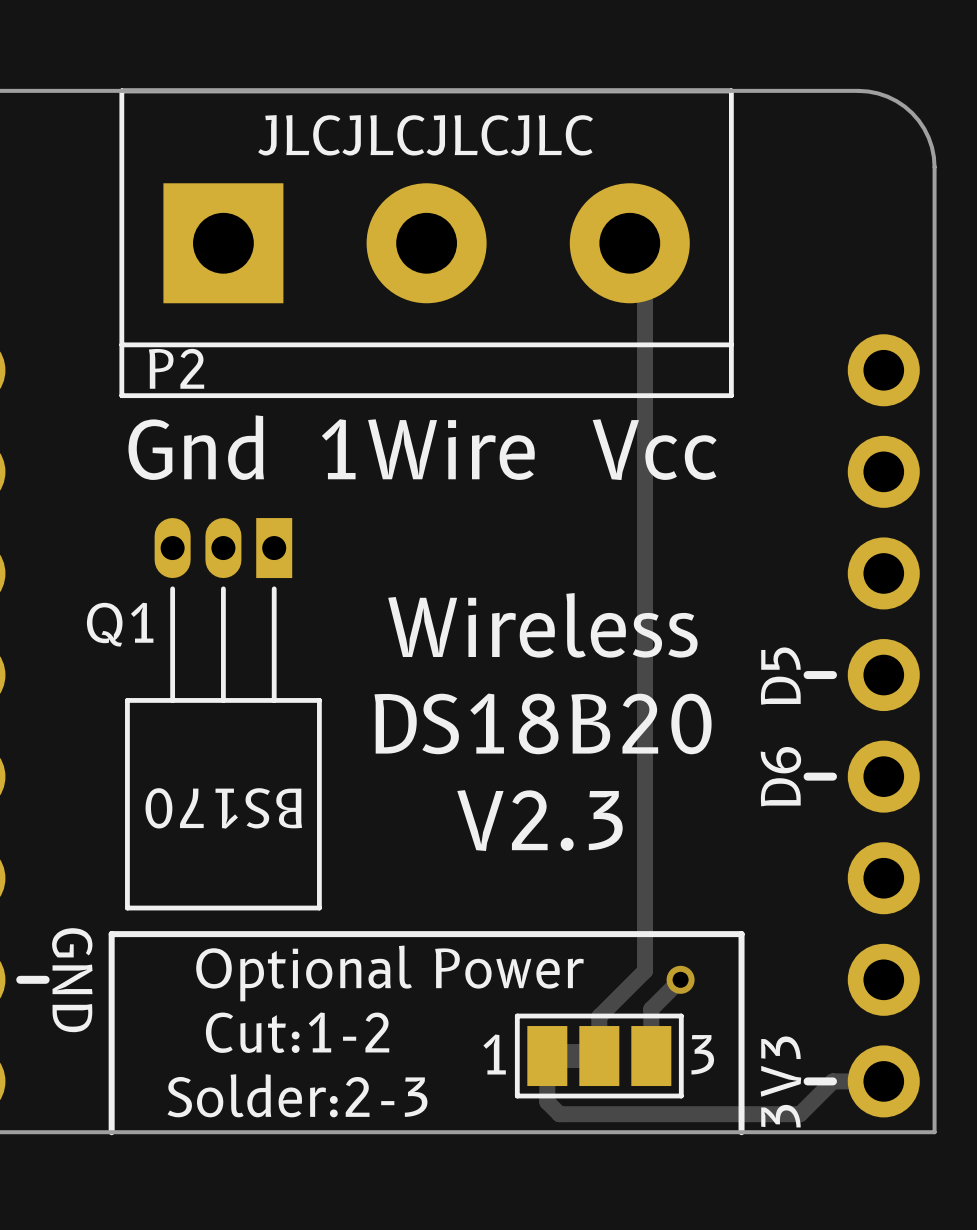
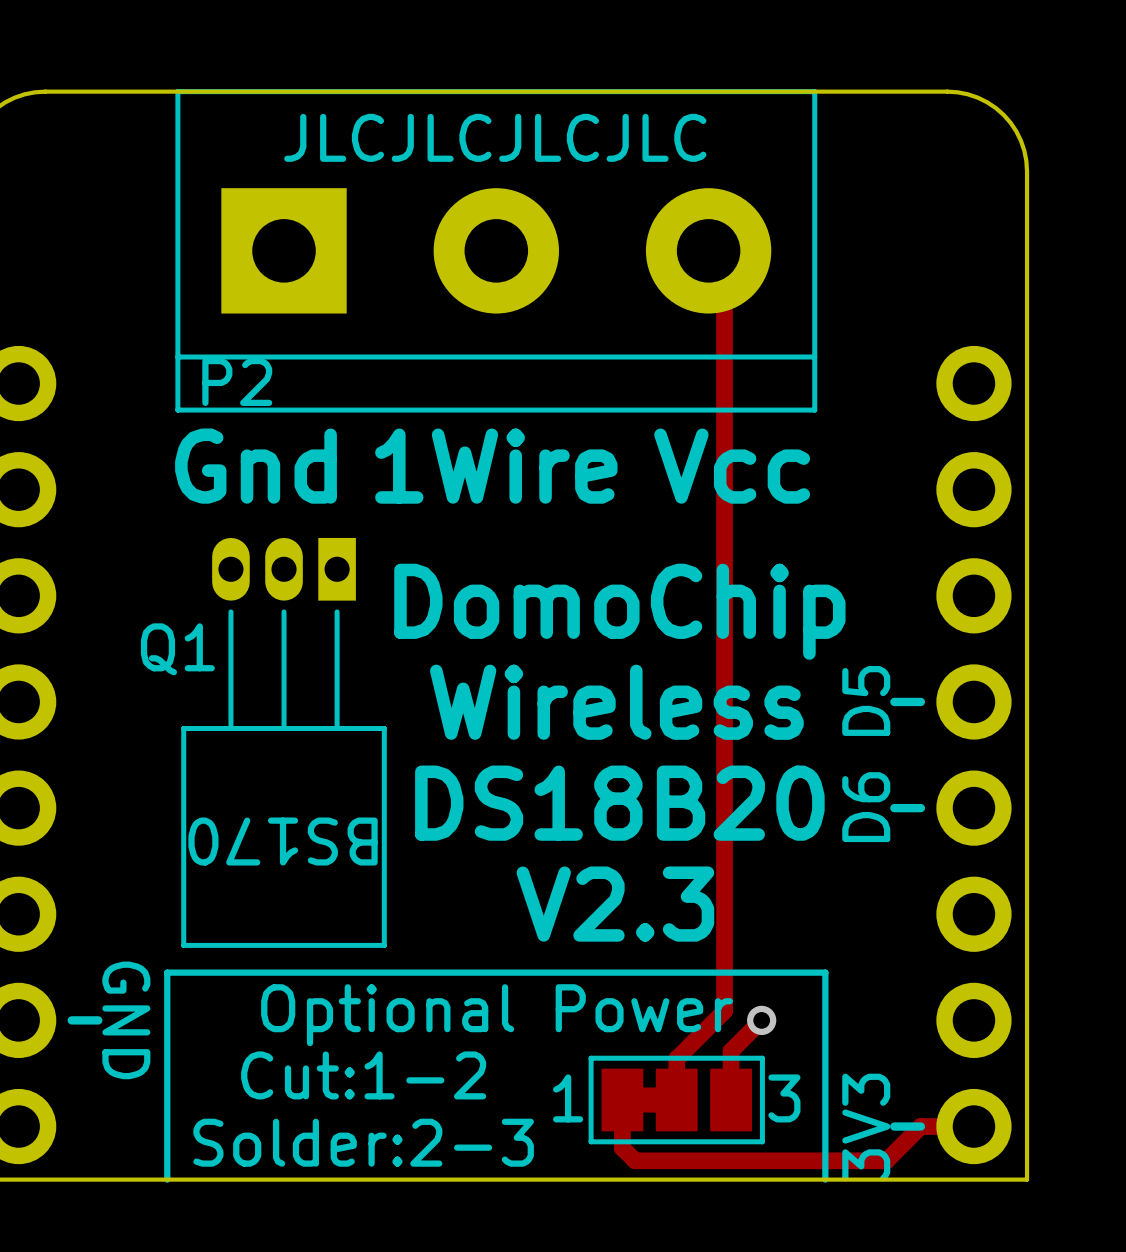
text: none -> DomoChip (619, 611)
text position: Wireless (542, 625) -> Wireless (616, 702)
text position: DS18B20 (543, 723) -> DS18B20 (619, 803)
text position: V2.3 (539, 820) -> V2.3 (615, 904)

